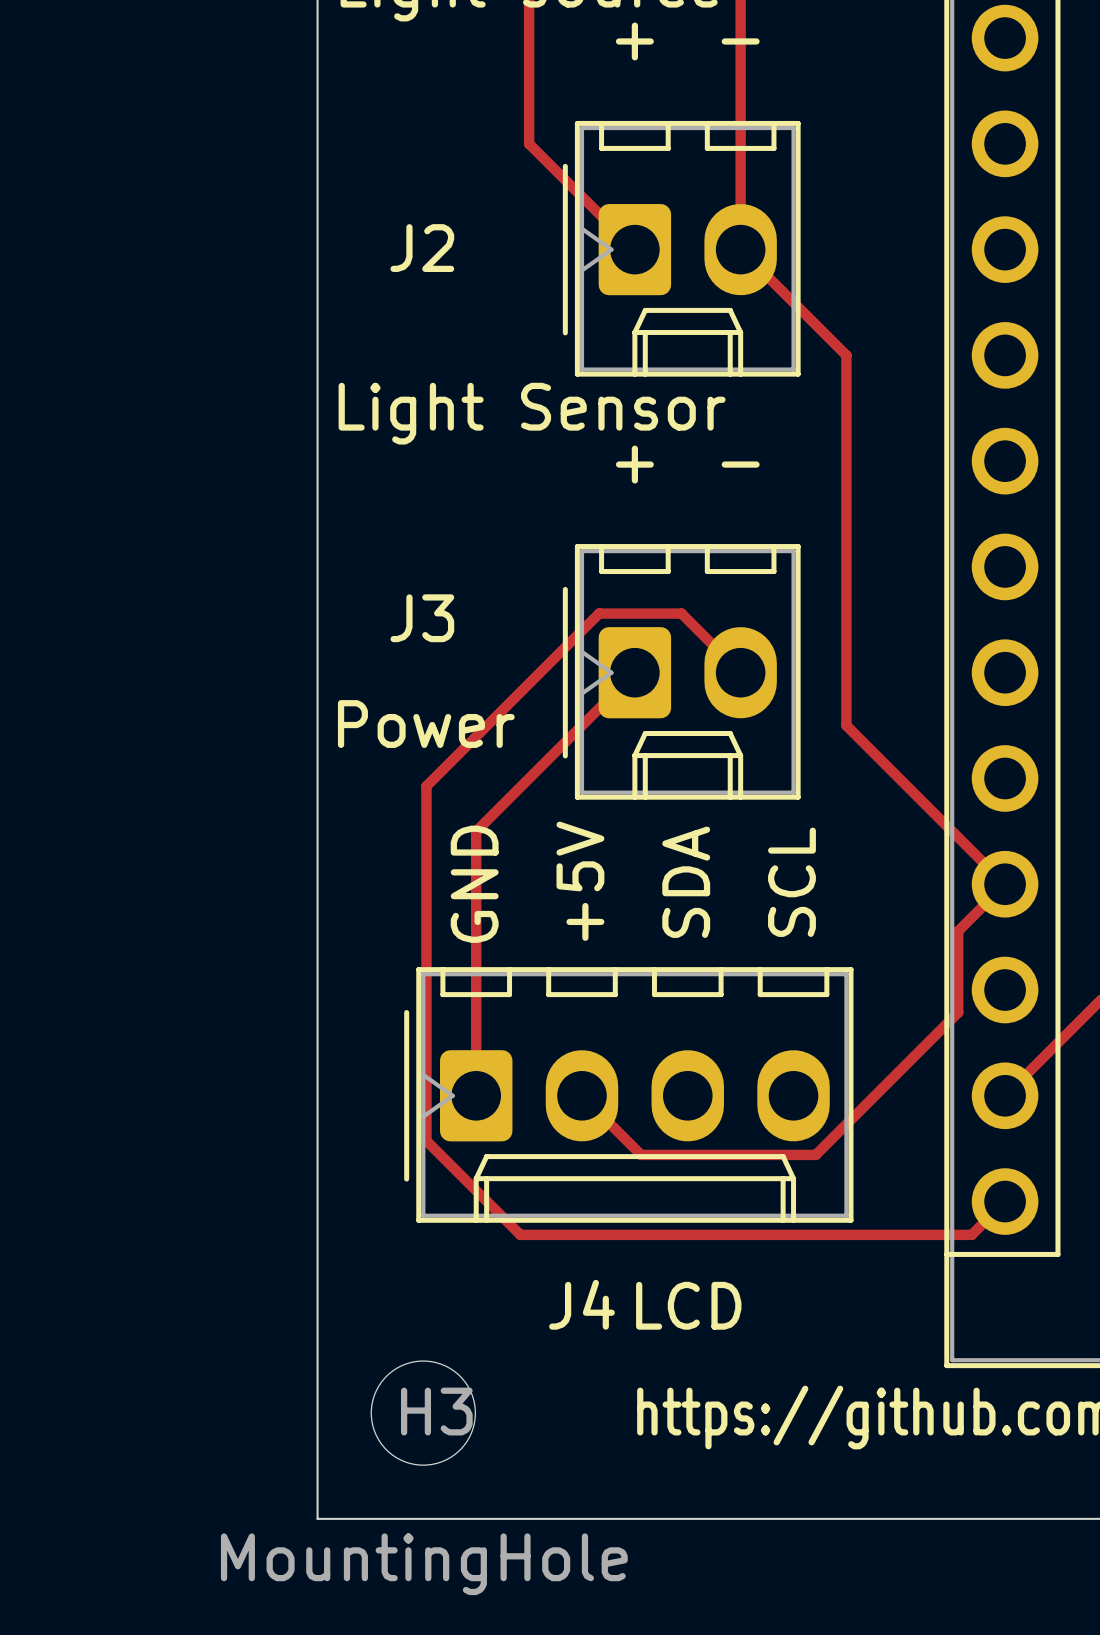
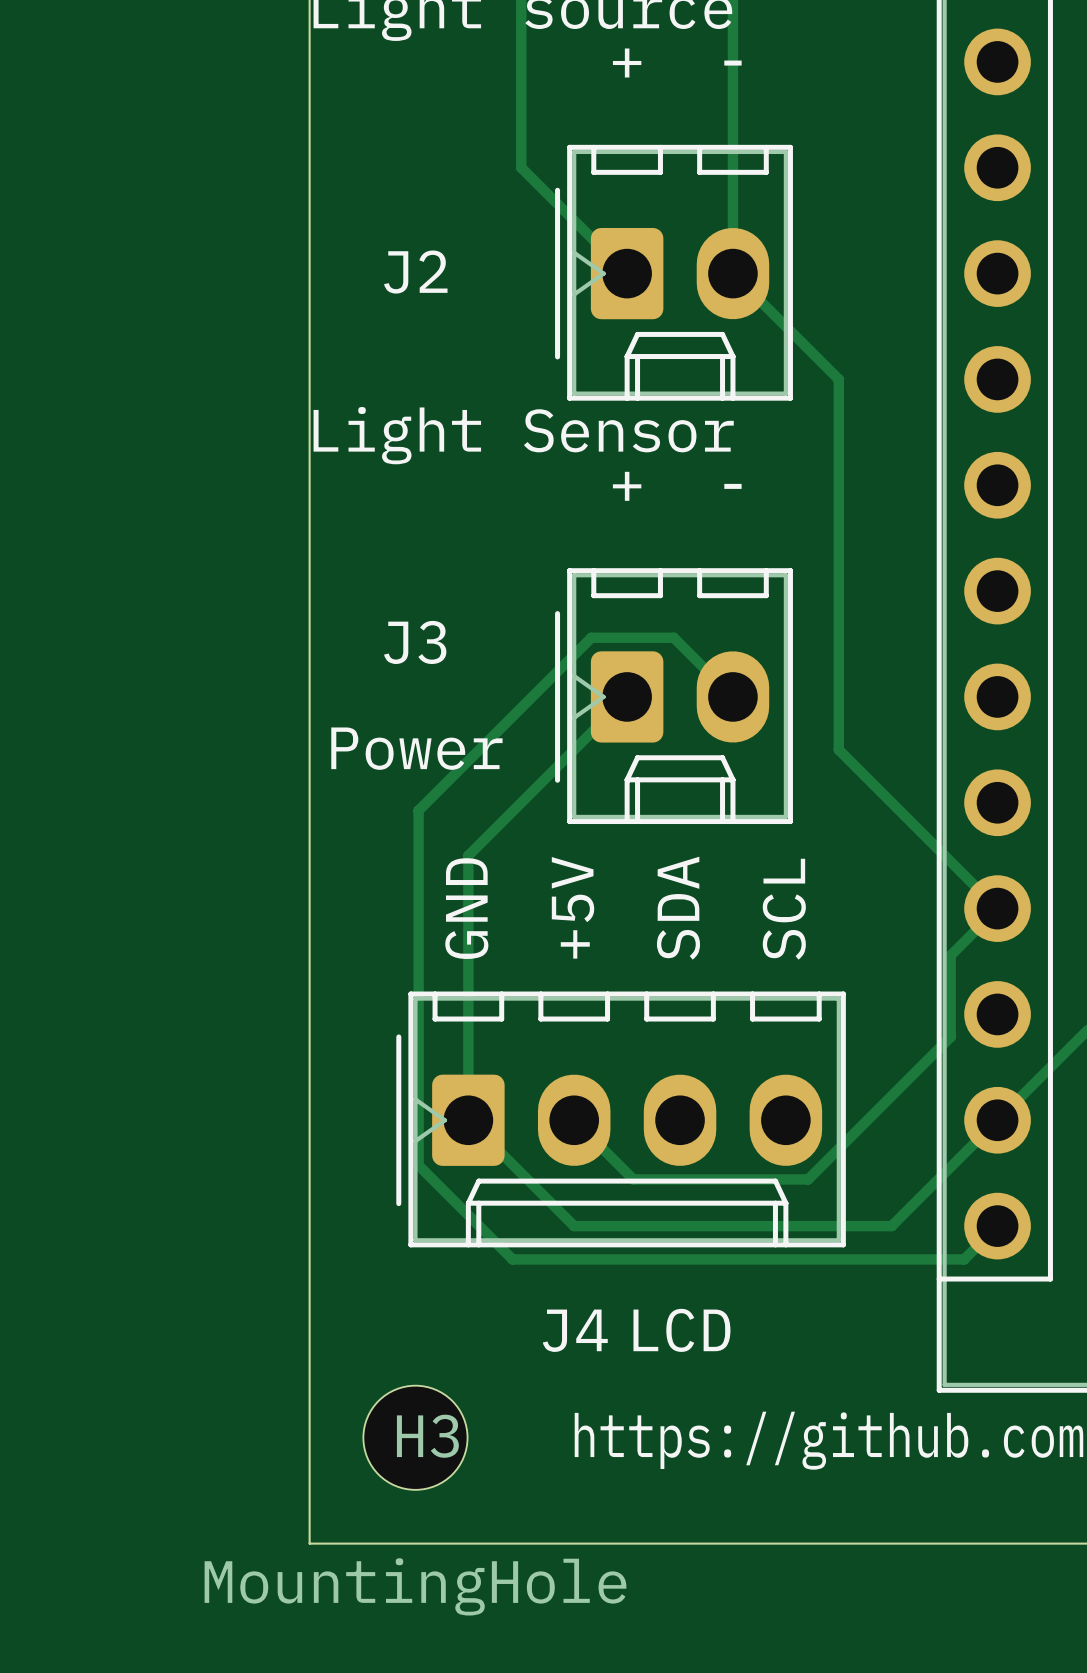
track: none -> (468, 1120) (574, 1226) (891, 1226) (997, 1120)

